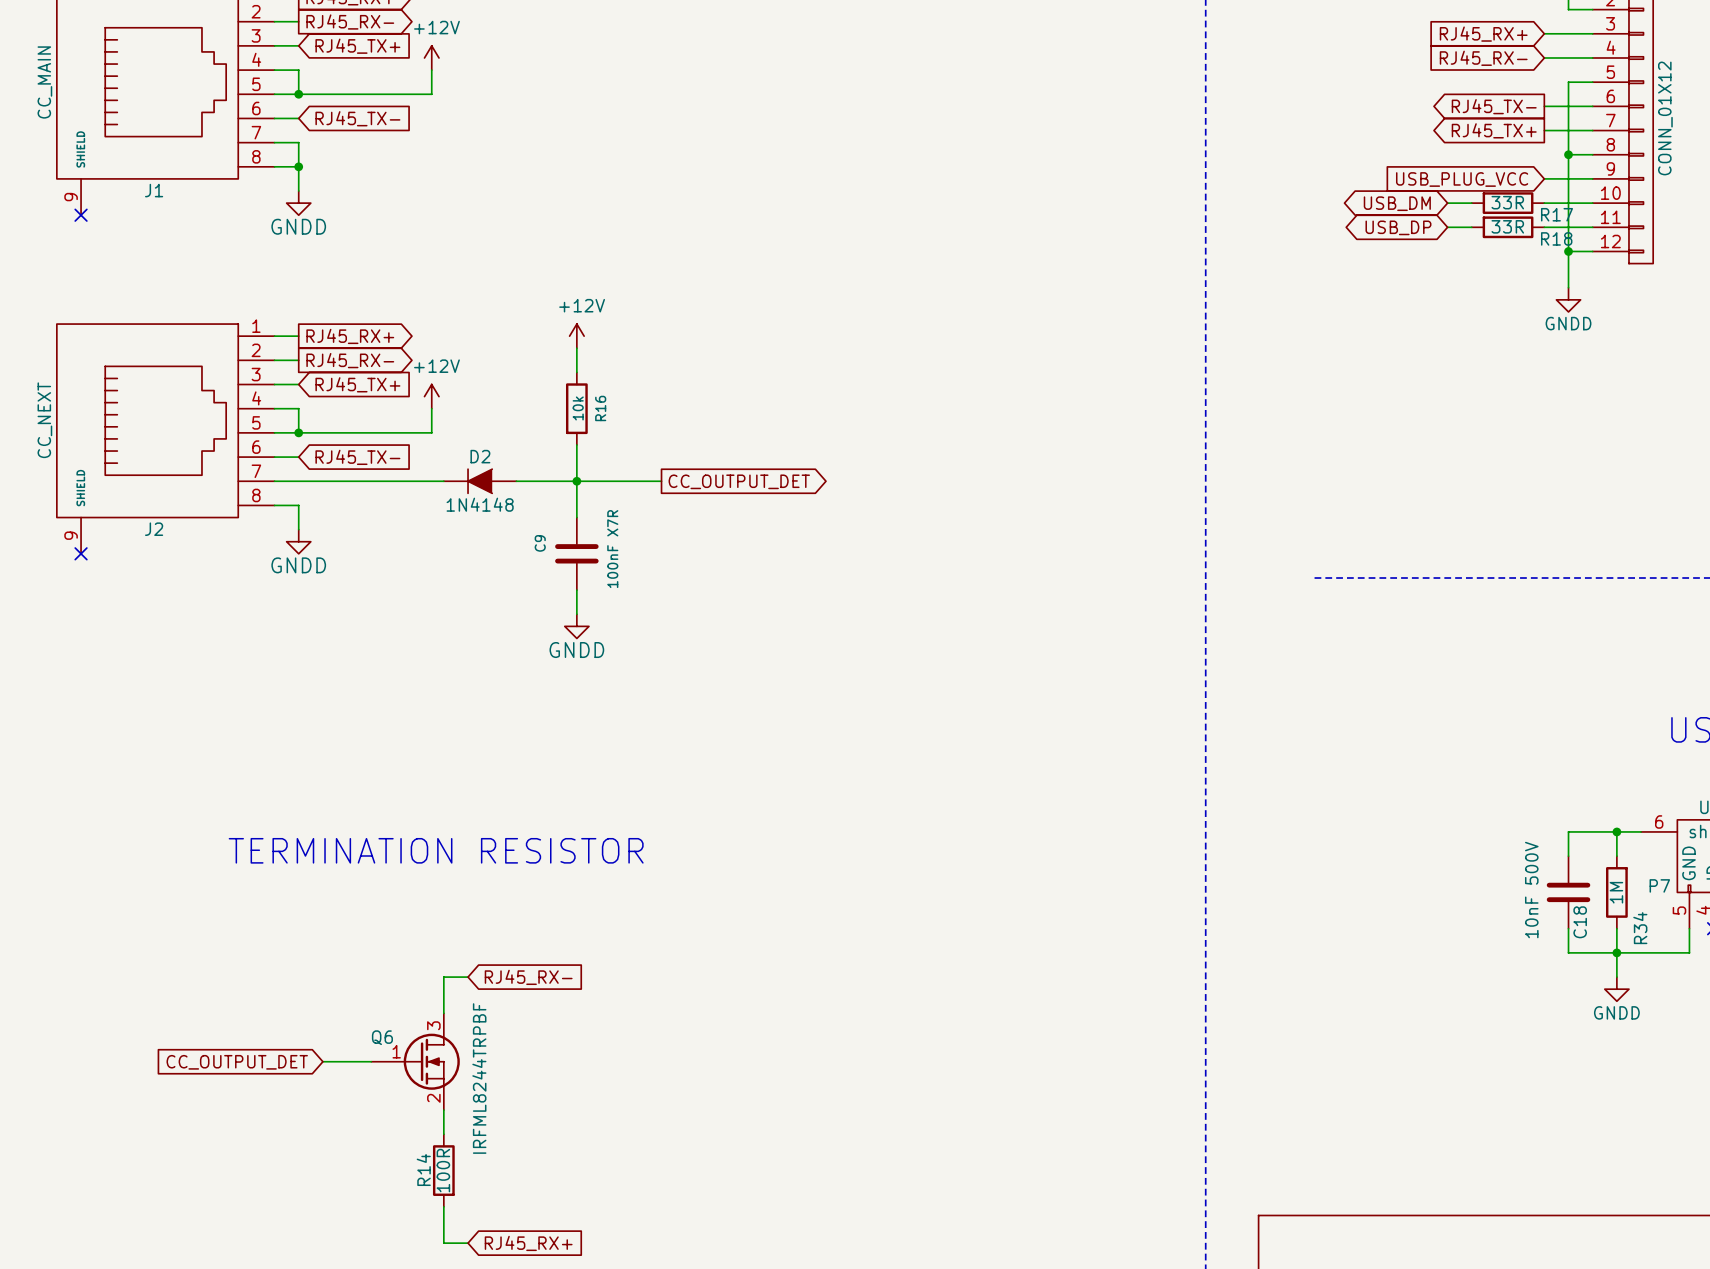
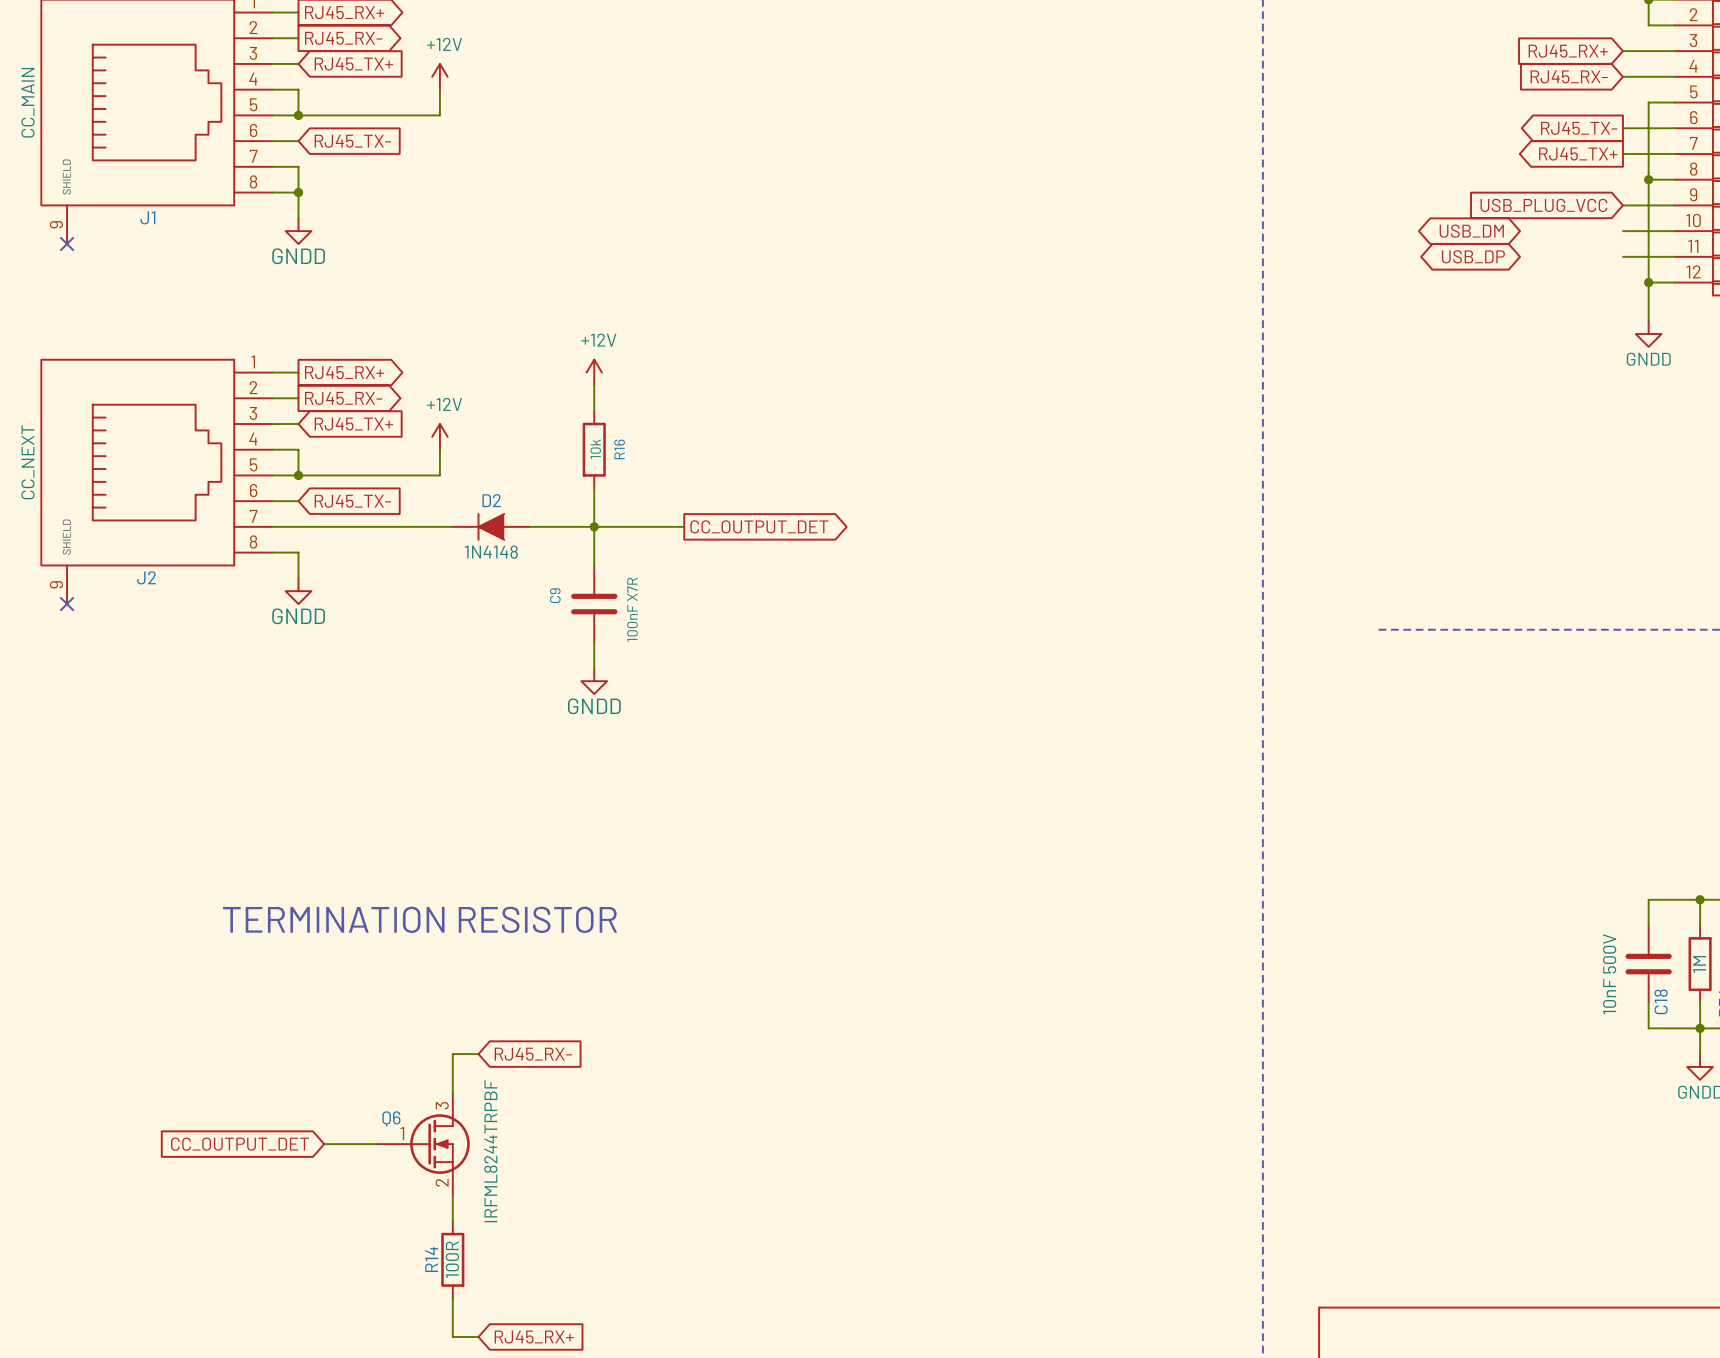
wire: (1447, 203) (1471, 203) -> none
R17: 33R (1508, 203) -> none
wire: (1447, 227) (1471, 227) -> none
R18: 33R (1508, 227) -> none

